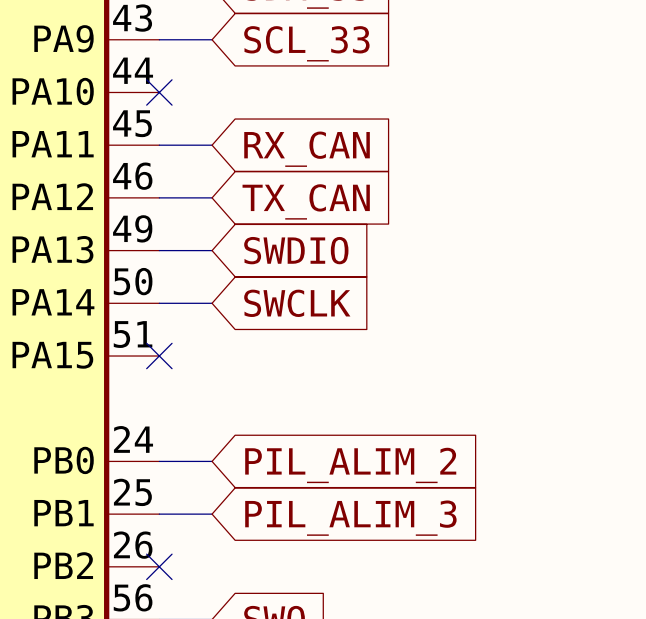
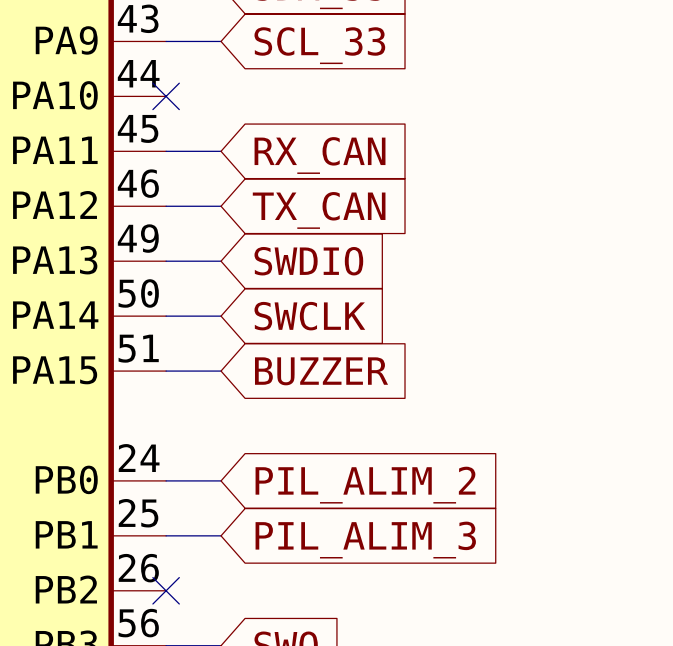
wire: none -> (166, 371) (221, 371)
no-connect mark: (159, 356) -> none
global label: none -> BUZZER (321, 371)

